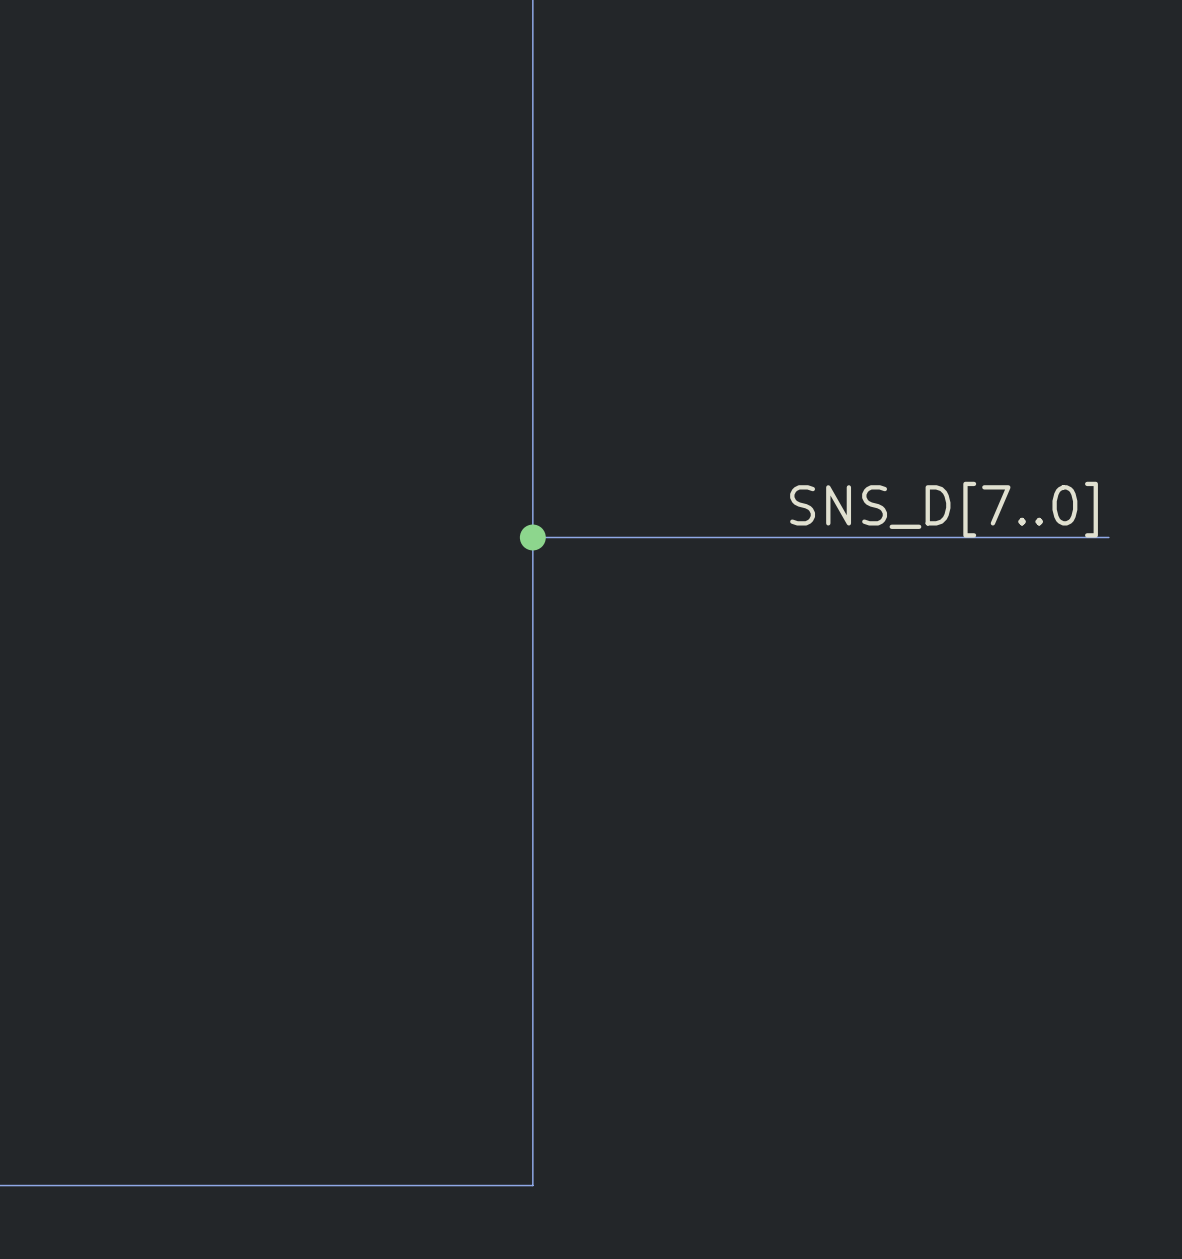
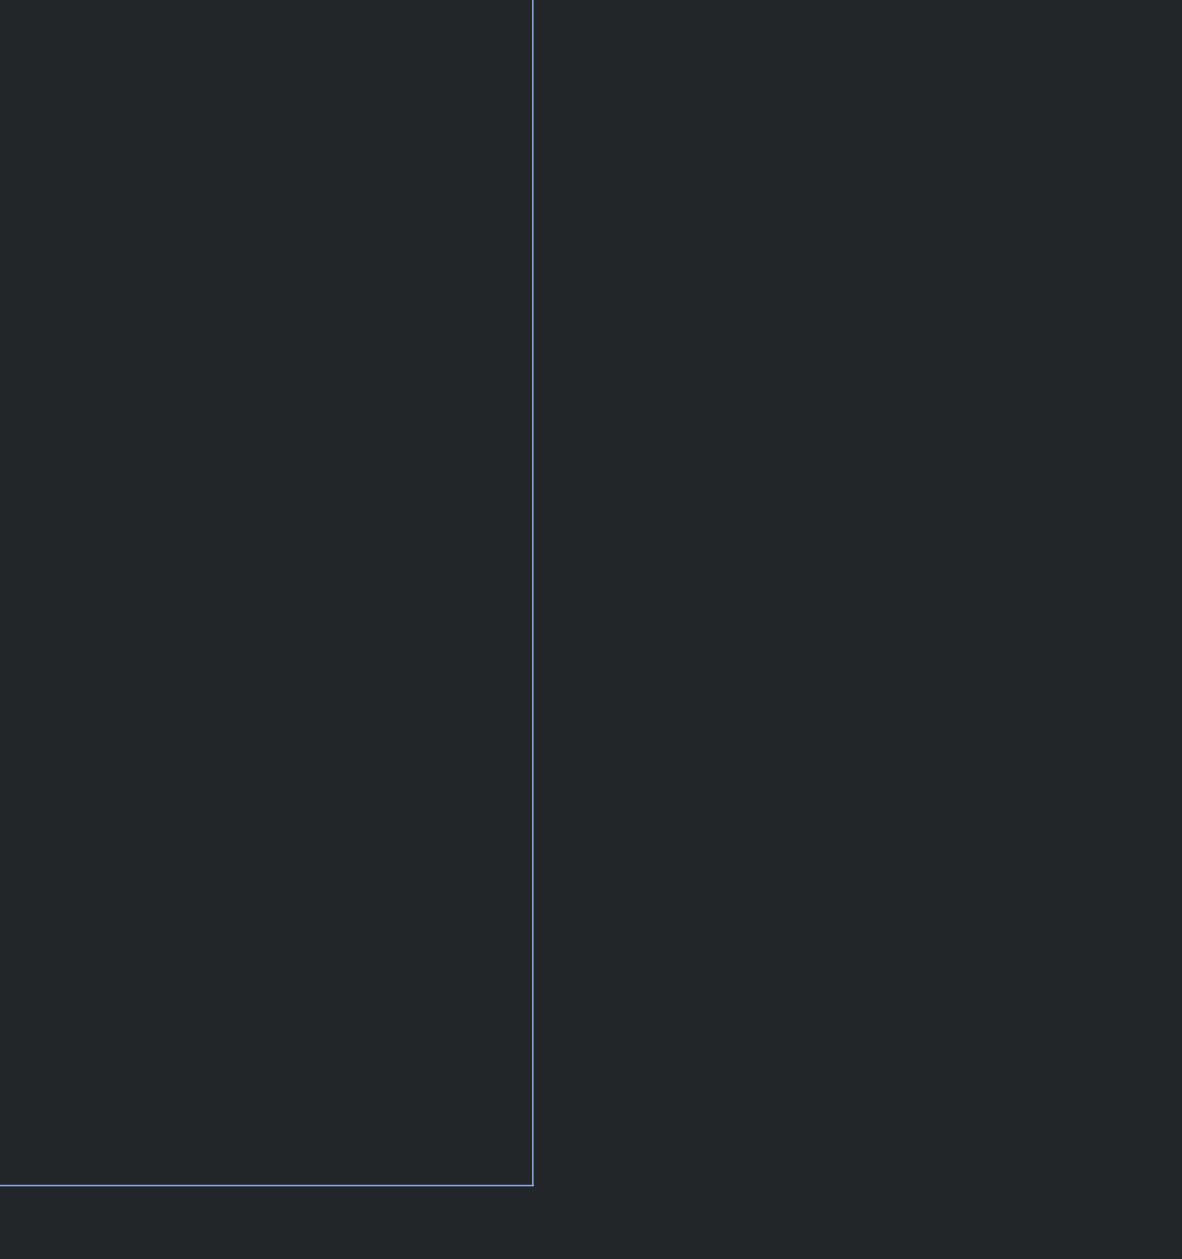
label: SNS_D[7..0] (944, 509) -> none
bus: (532, 537) (1108, 537) -> none
junction: (532, 537) -> none

